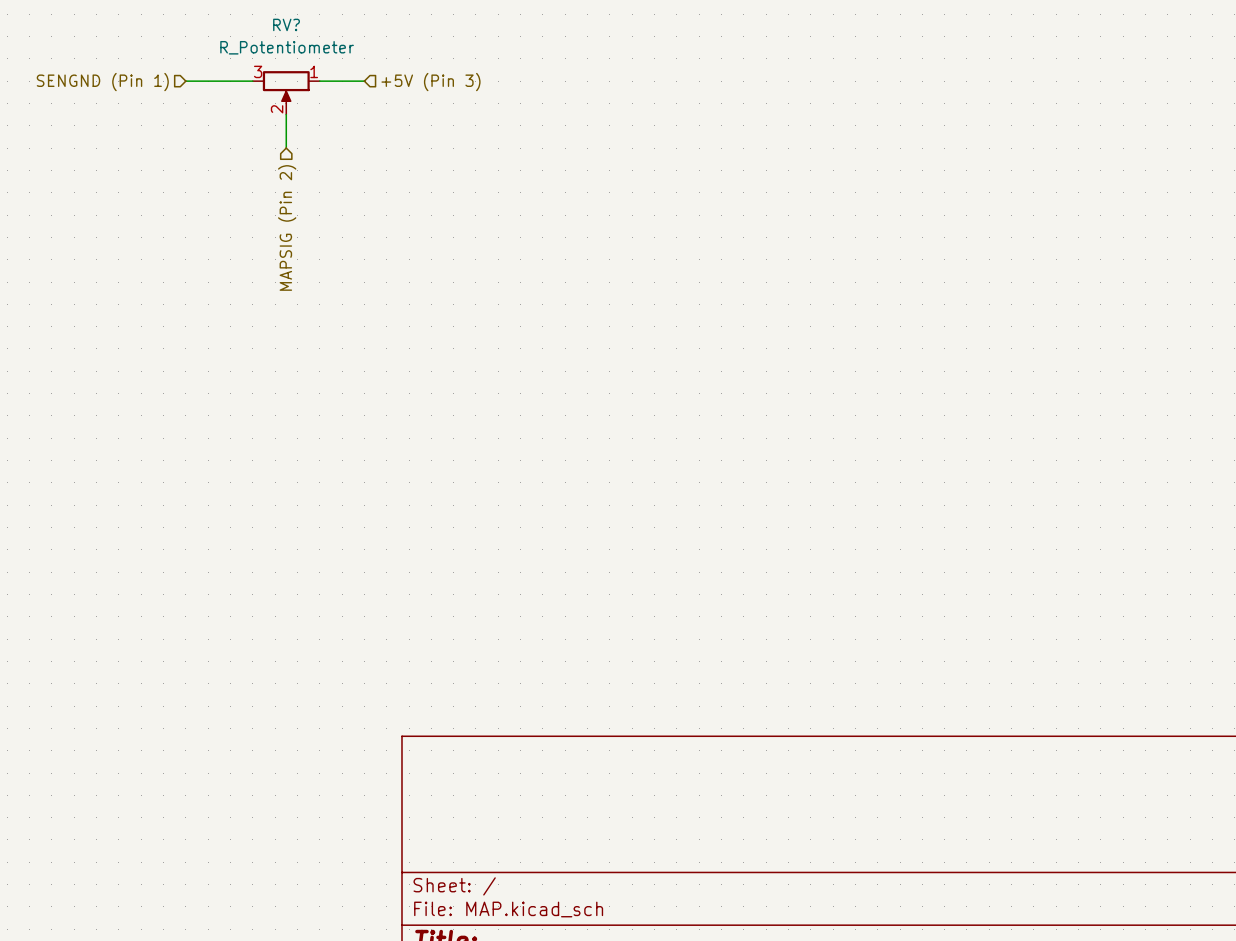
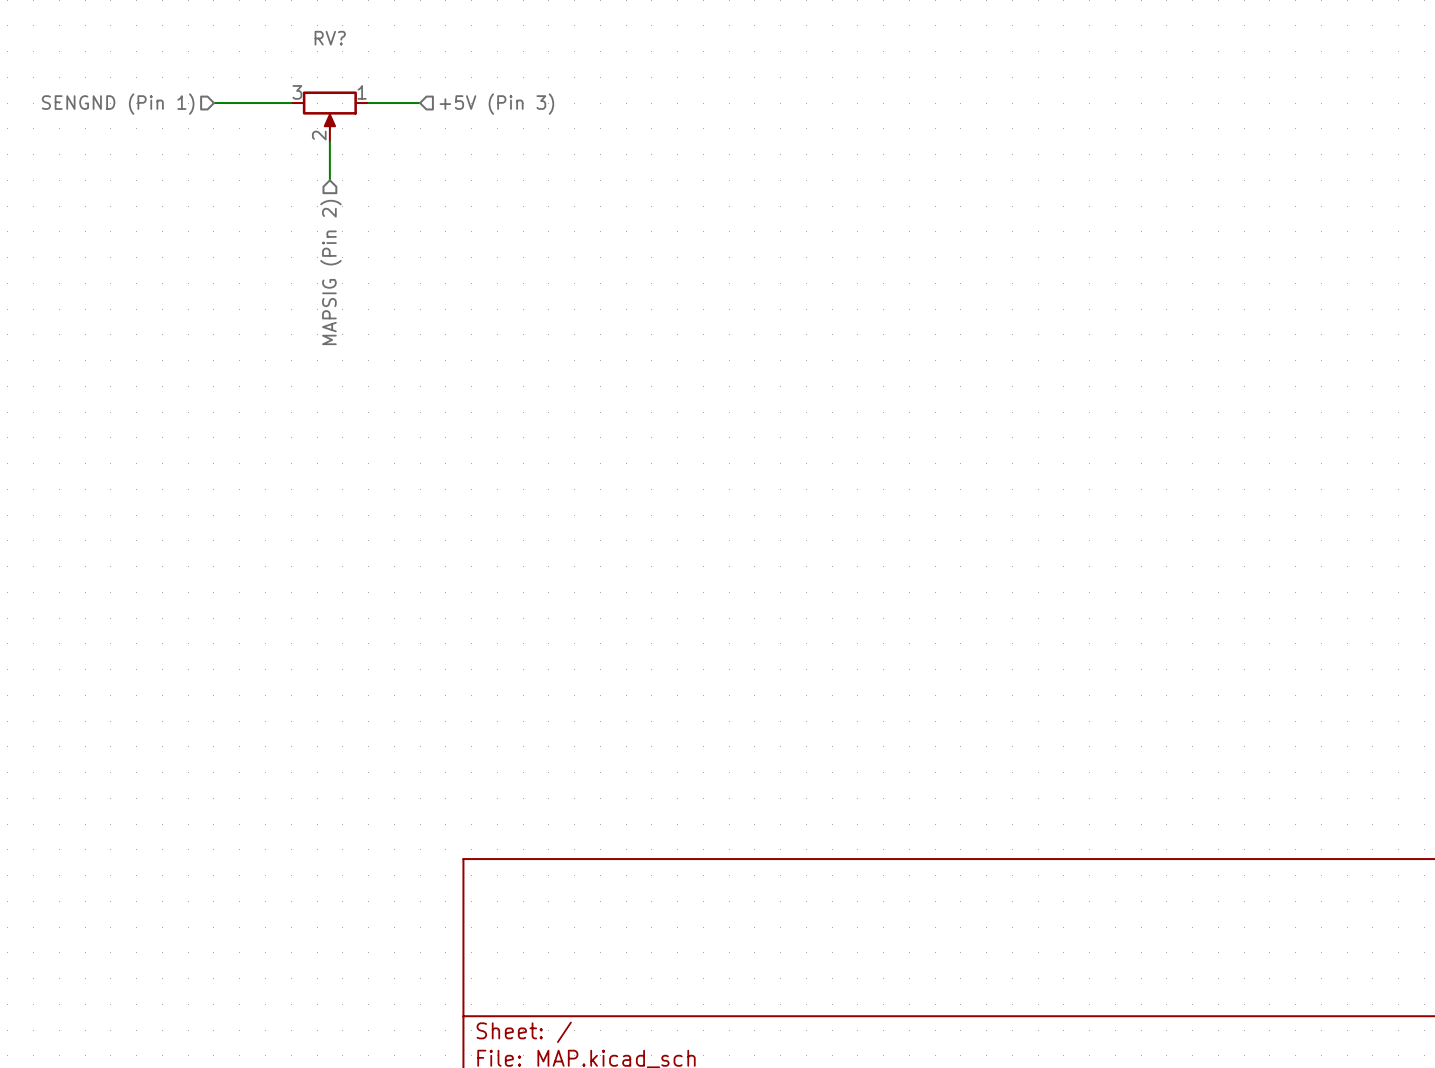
RV? value: R_Potentiometer (287, 47) -> none

